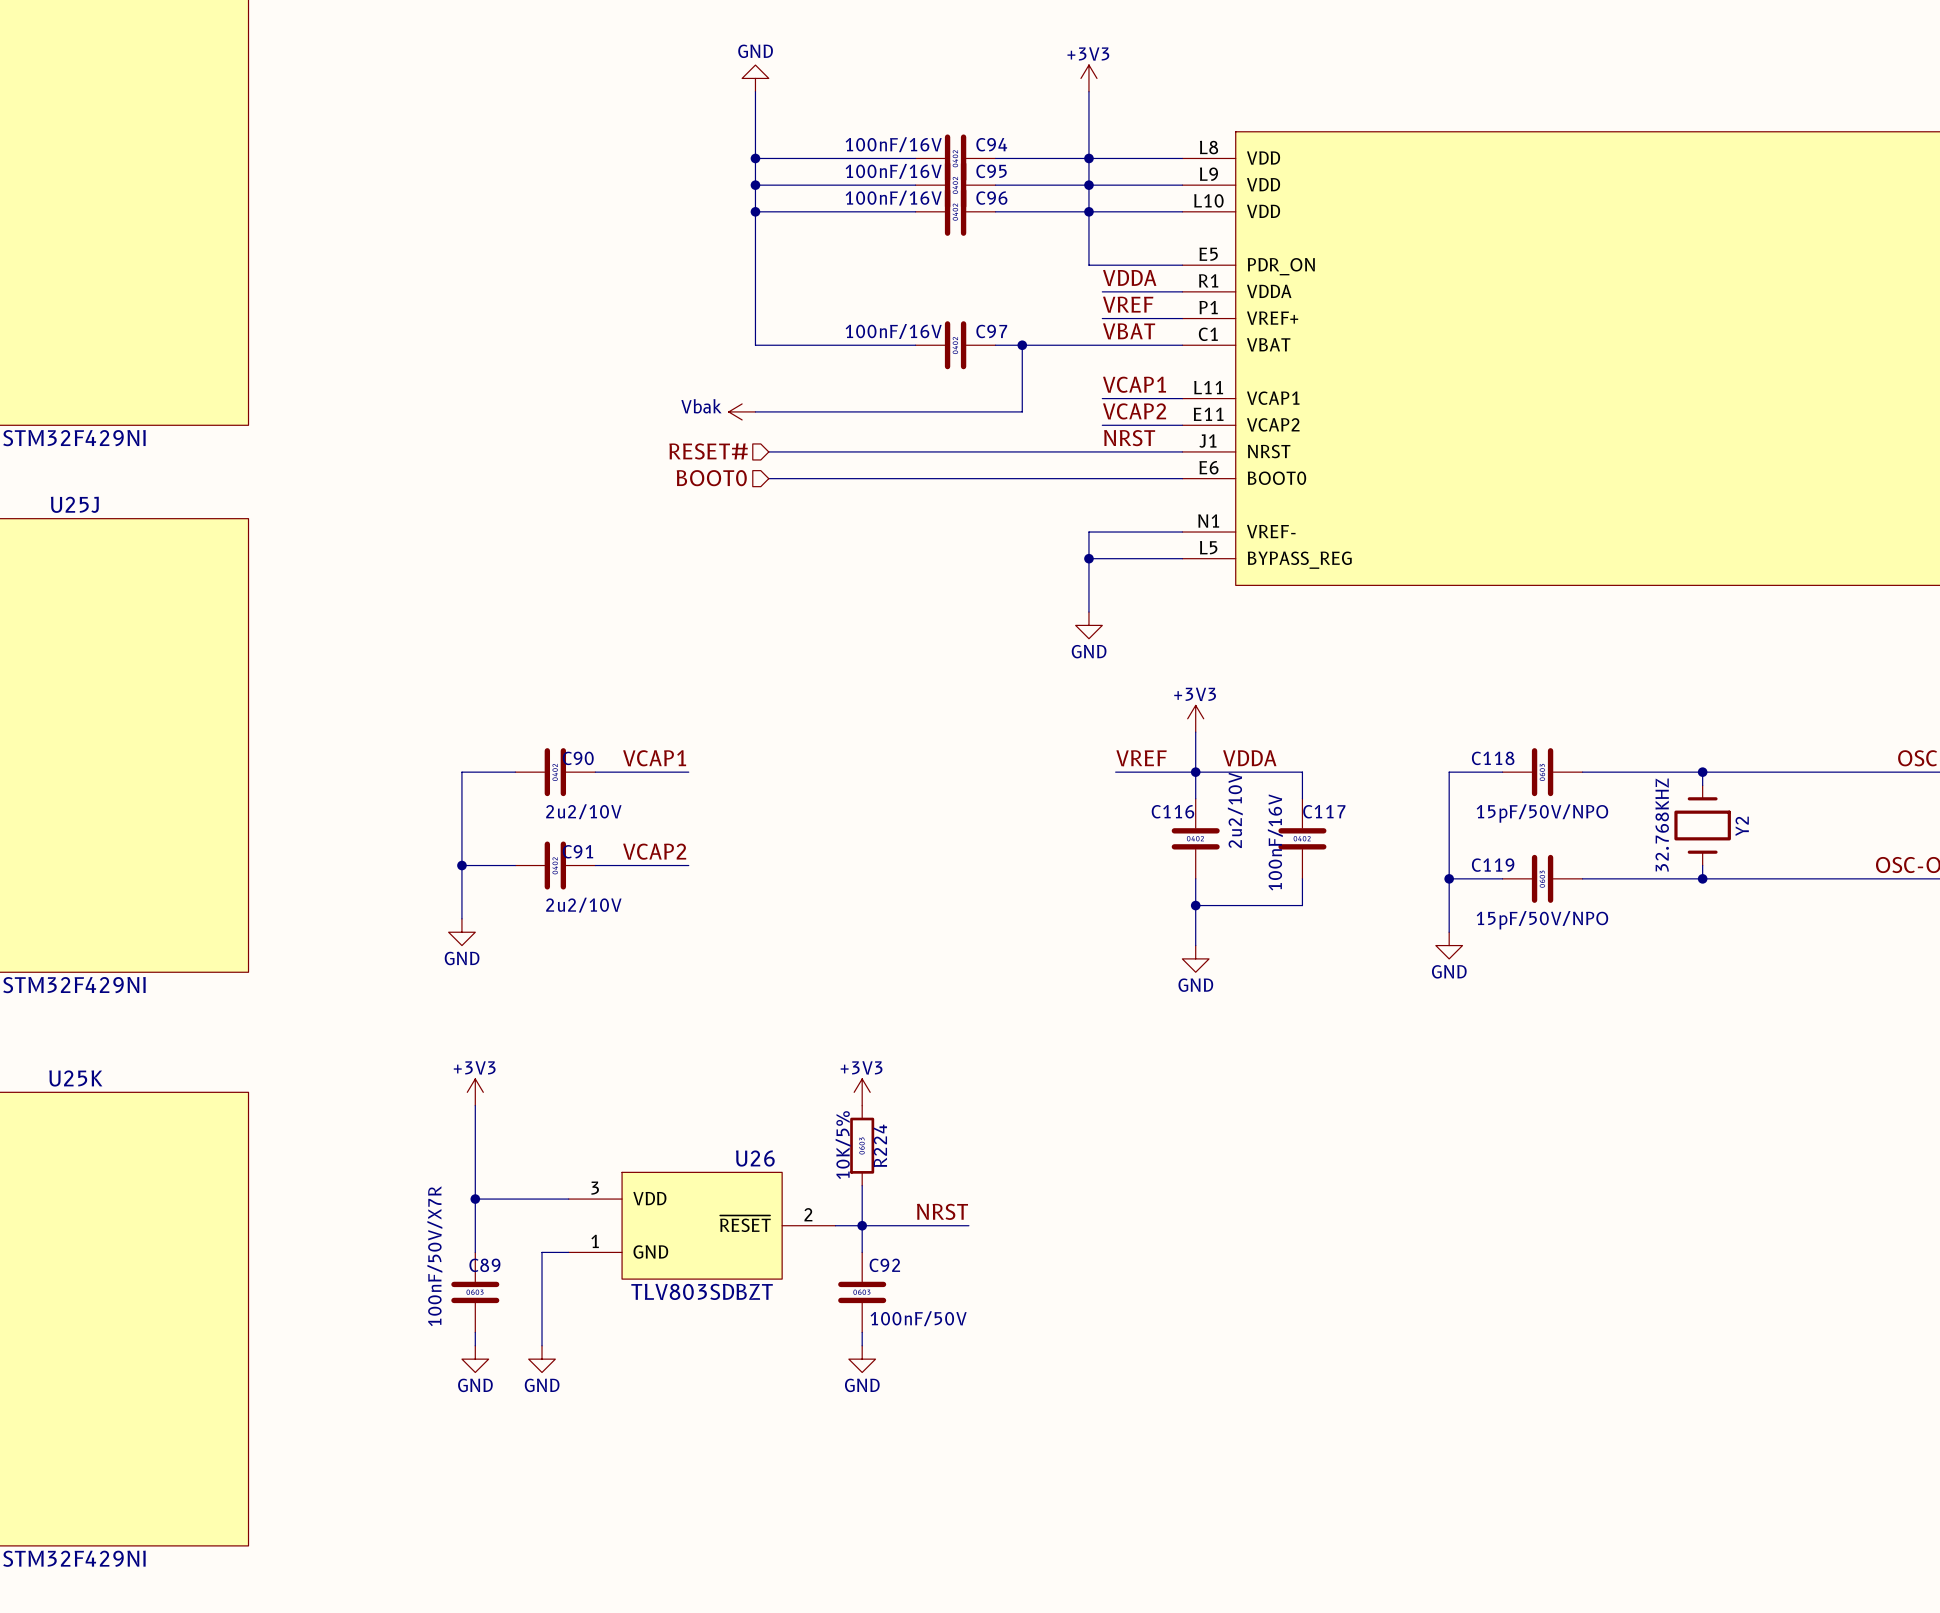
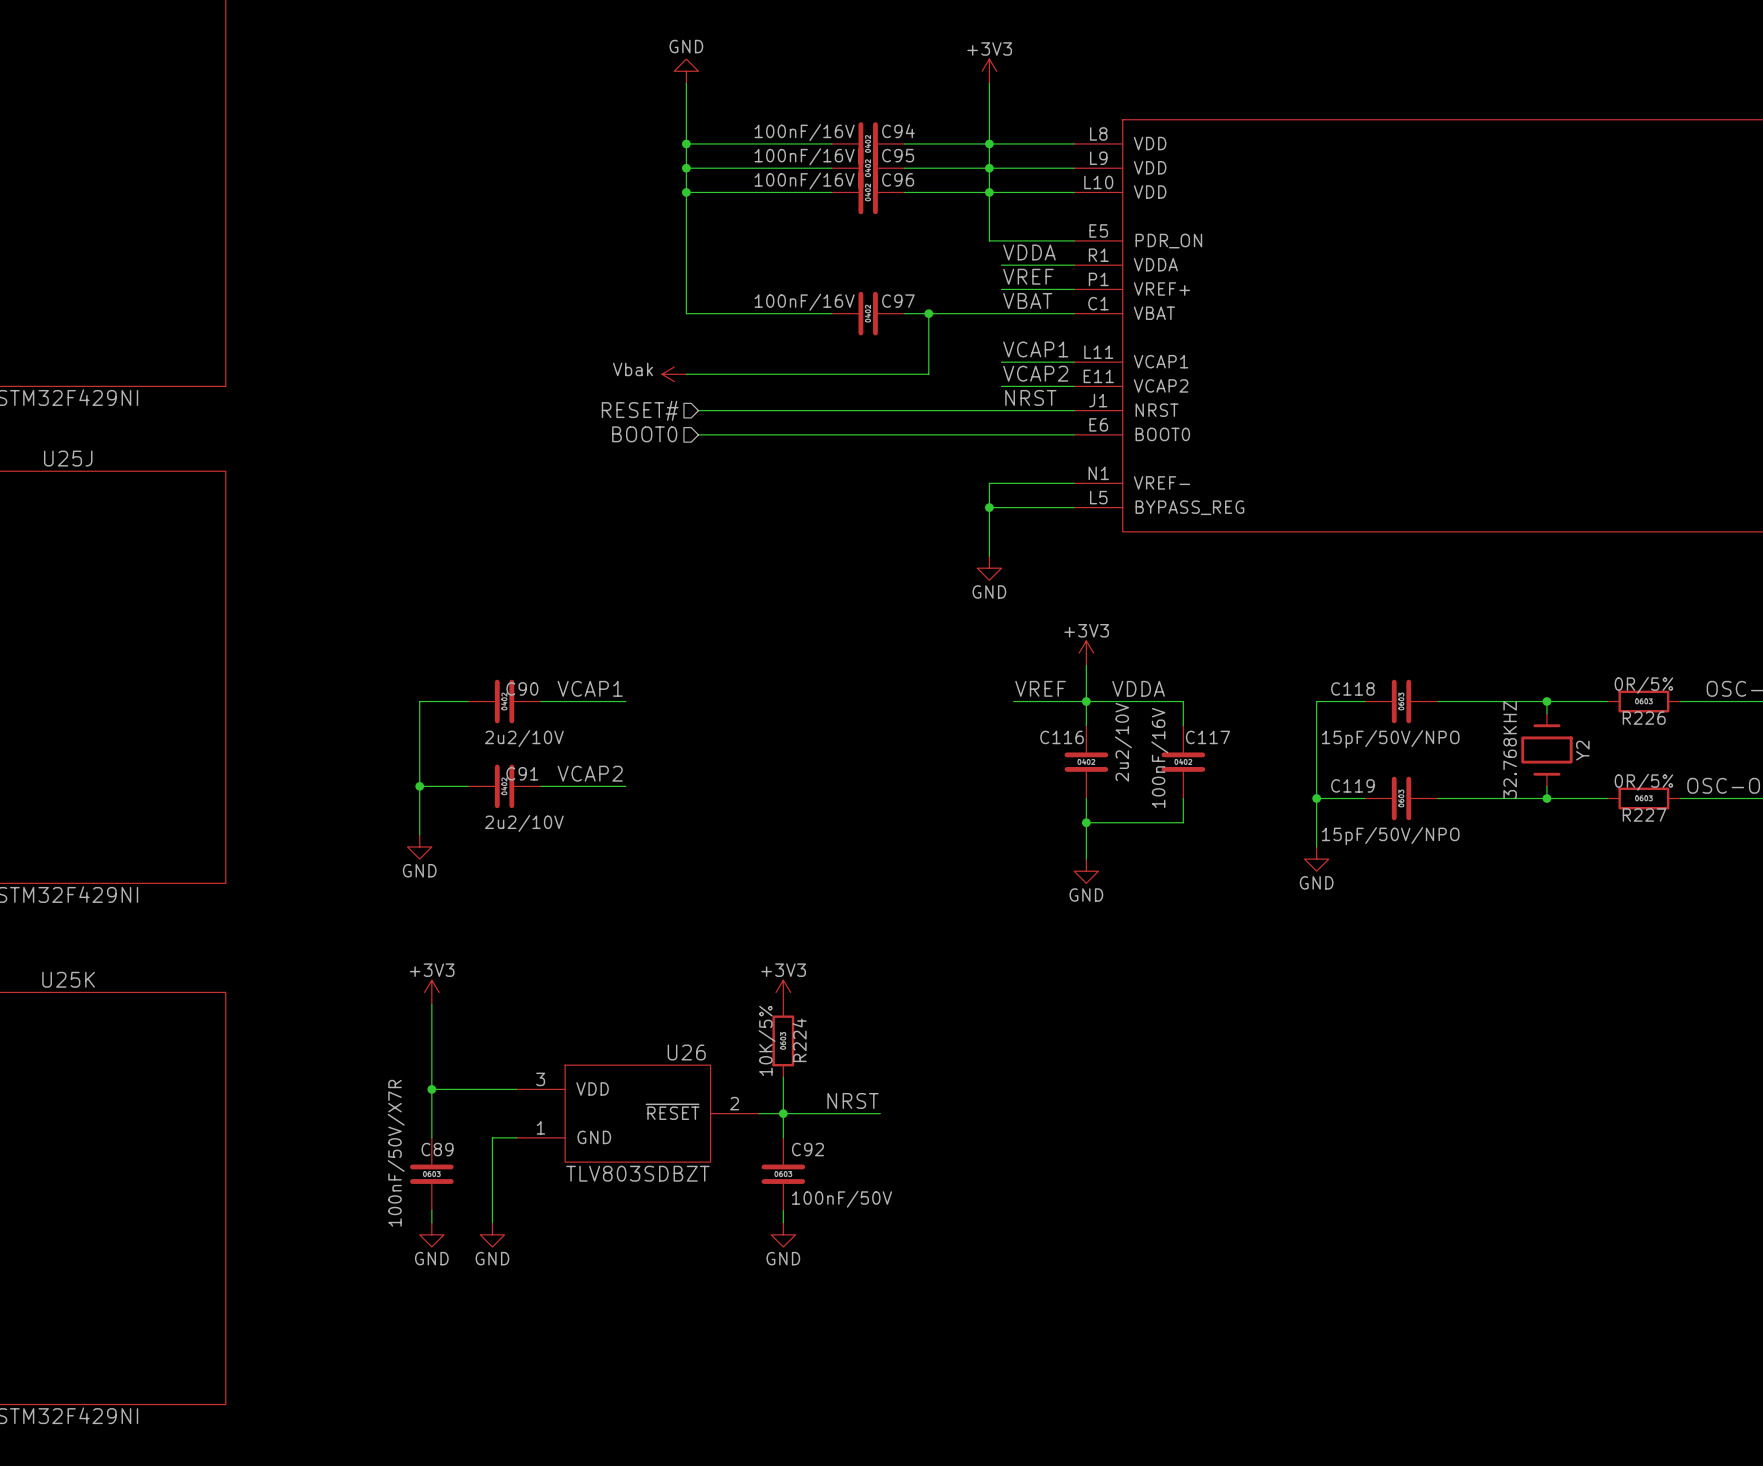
wire: (1769, 772) (1849, 772) -> none
R226: none -> 0R/5% (1643, 701)
wire: (1769, 878) (1849, 878) -> none
R227: none -> 0R/5% (1643, 798)

